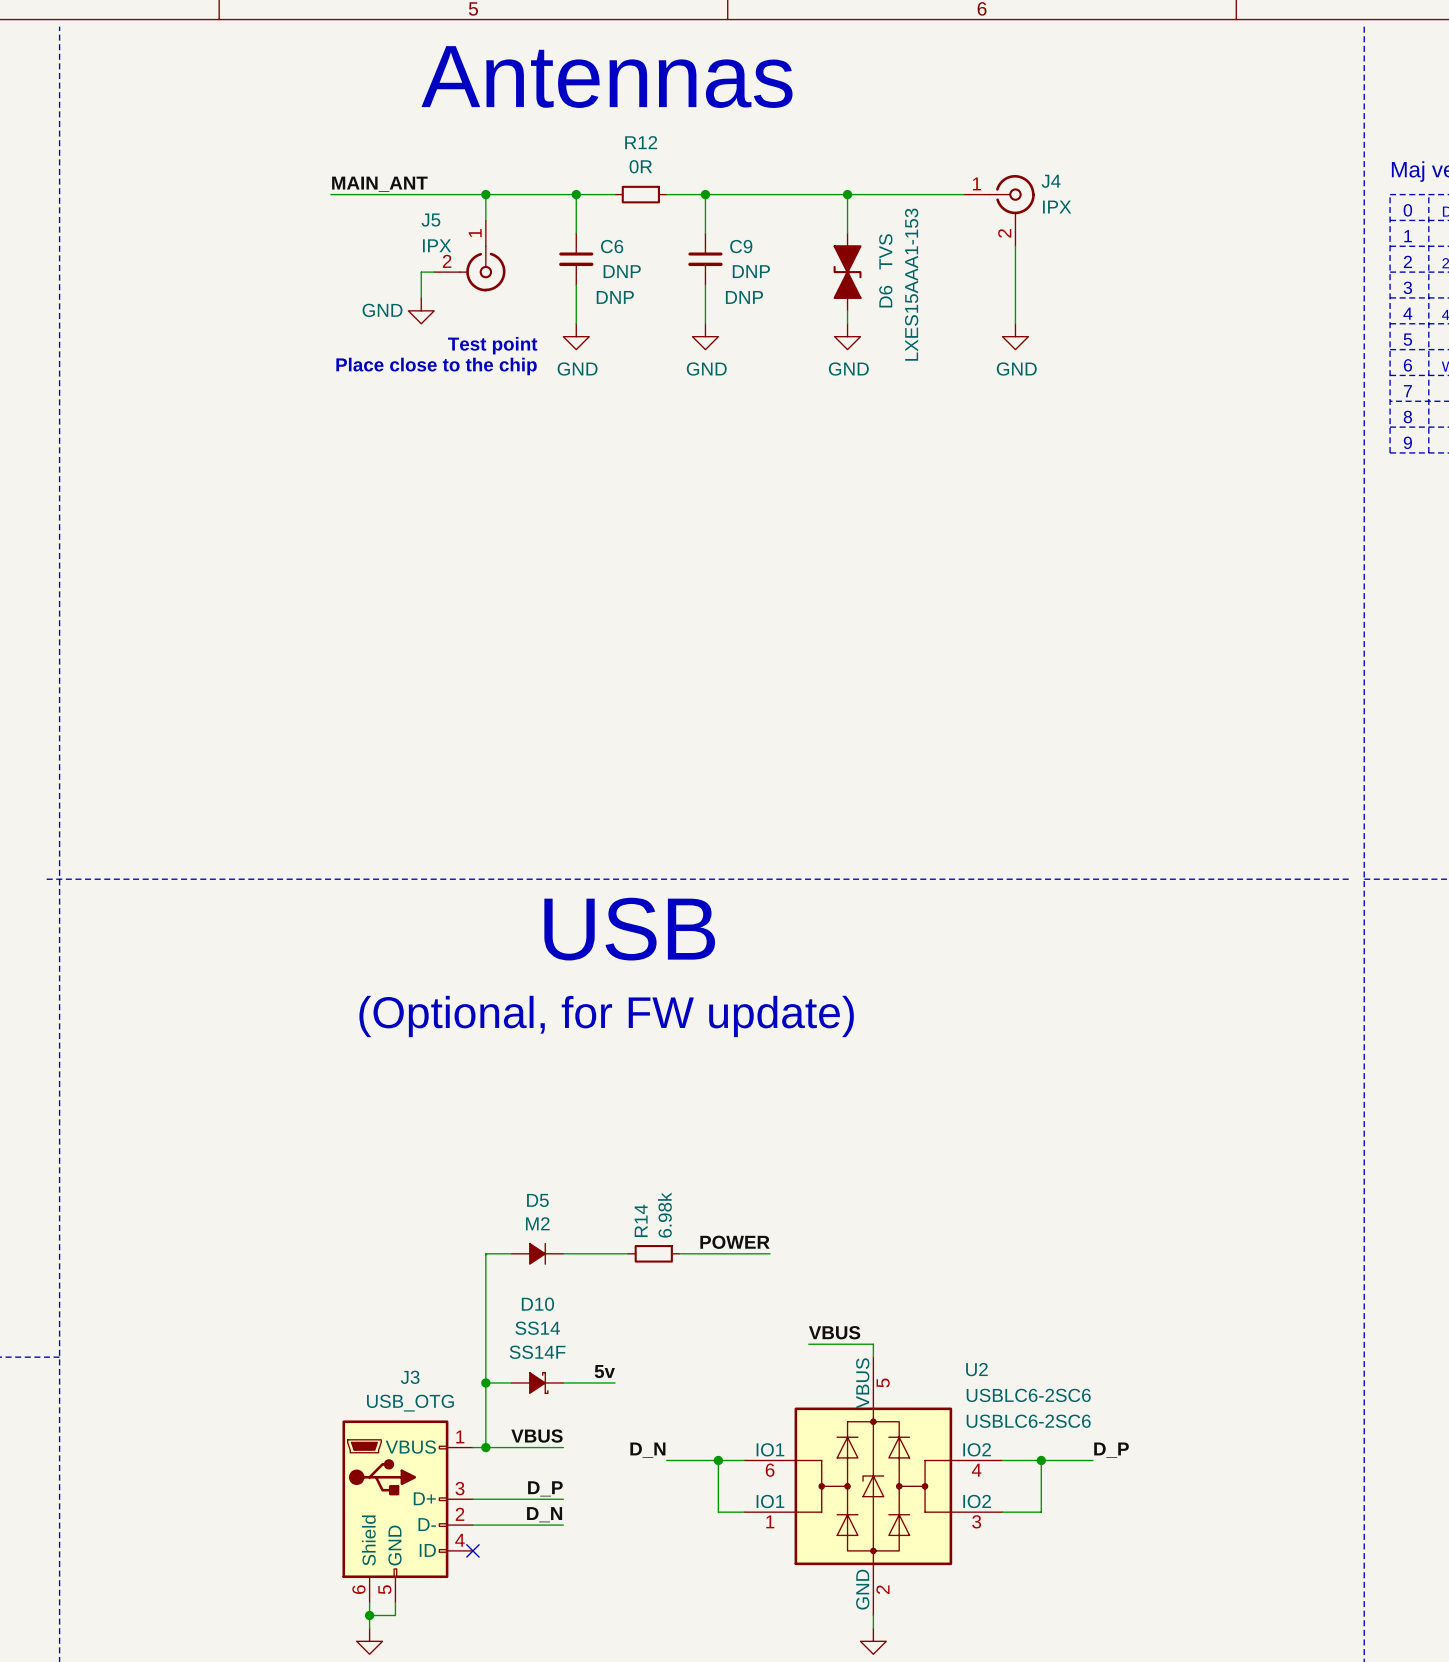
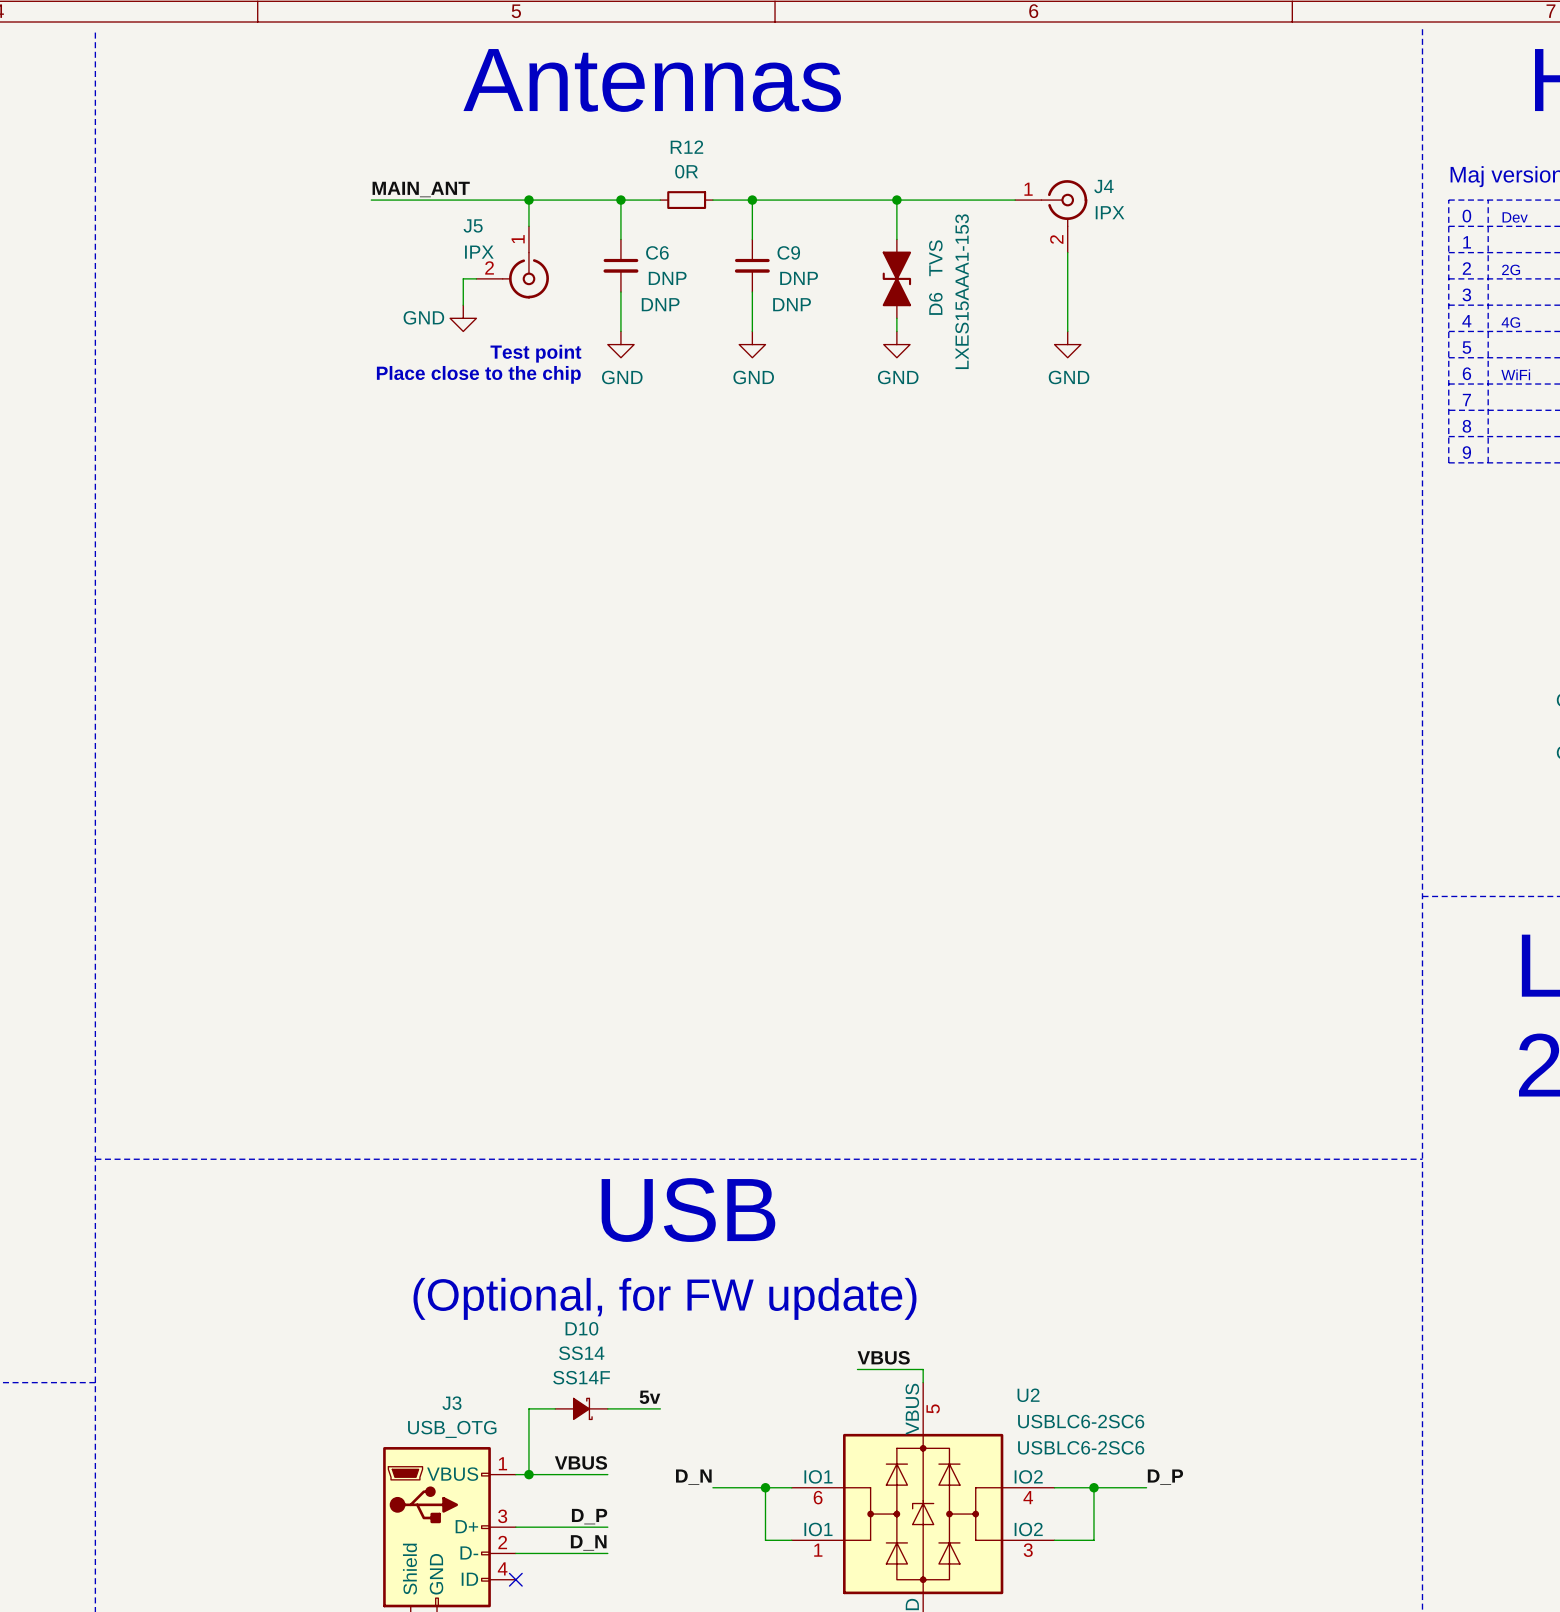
line: (46, 879) (1351, 879) -> none
text: USB (629, 929) -> none
text: (Optional, for FW update) (606, 1016) -> none
line: none -> (95, 1159) (1422, 1159)
text: none -> USB (688, 1210)
label: POWER (735, 1242) -> none
wire: (511, 1253) (485, 1253) (485, 1382) -> none
D5: M2 (537, 1253) -> none
wire: (563, 1253) (627, 1253) -> none
R14: 6.98k (653, 1253) -> none
wire: (679, 1253) (770, 1253) -> none
text: none -> (Optional, for FW update) (664, 1298)
junction: (485, 1382) -> none

